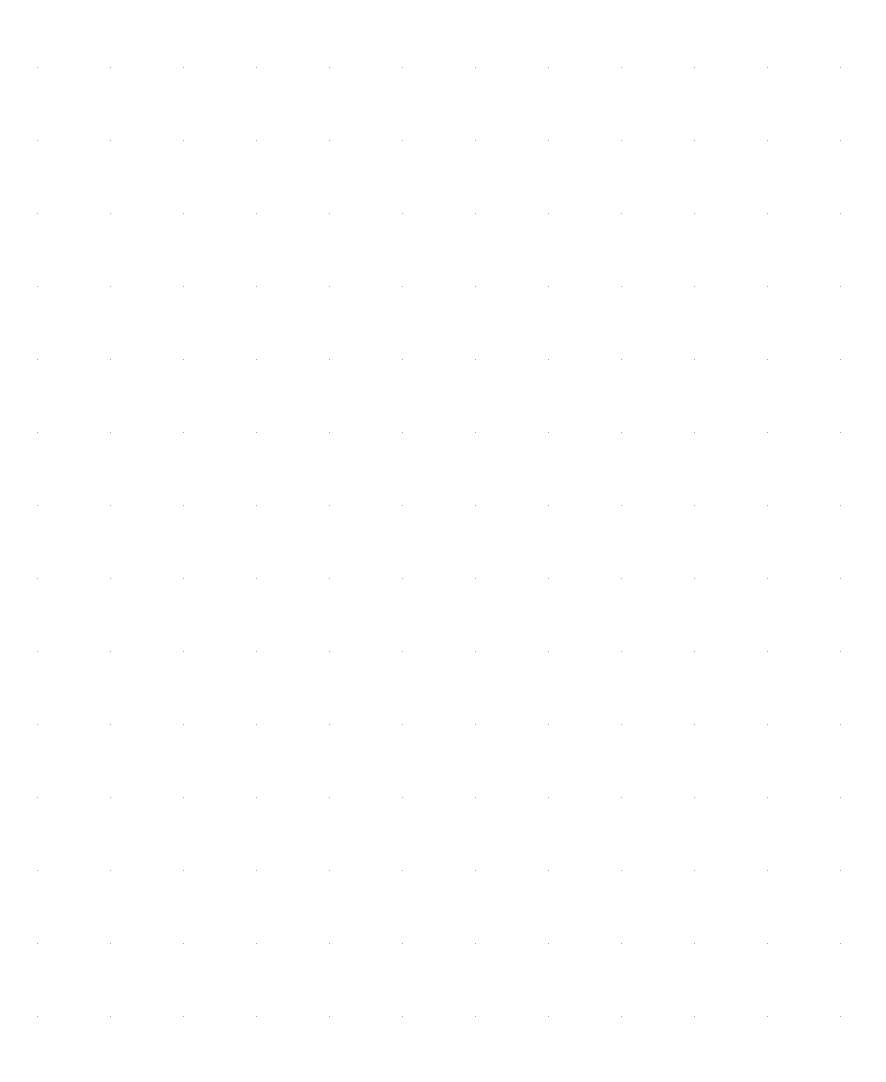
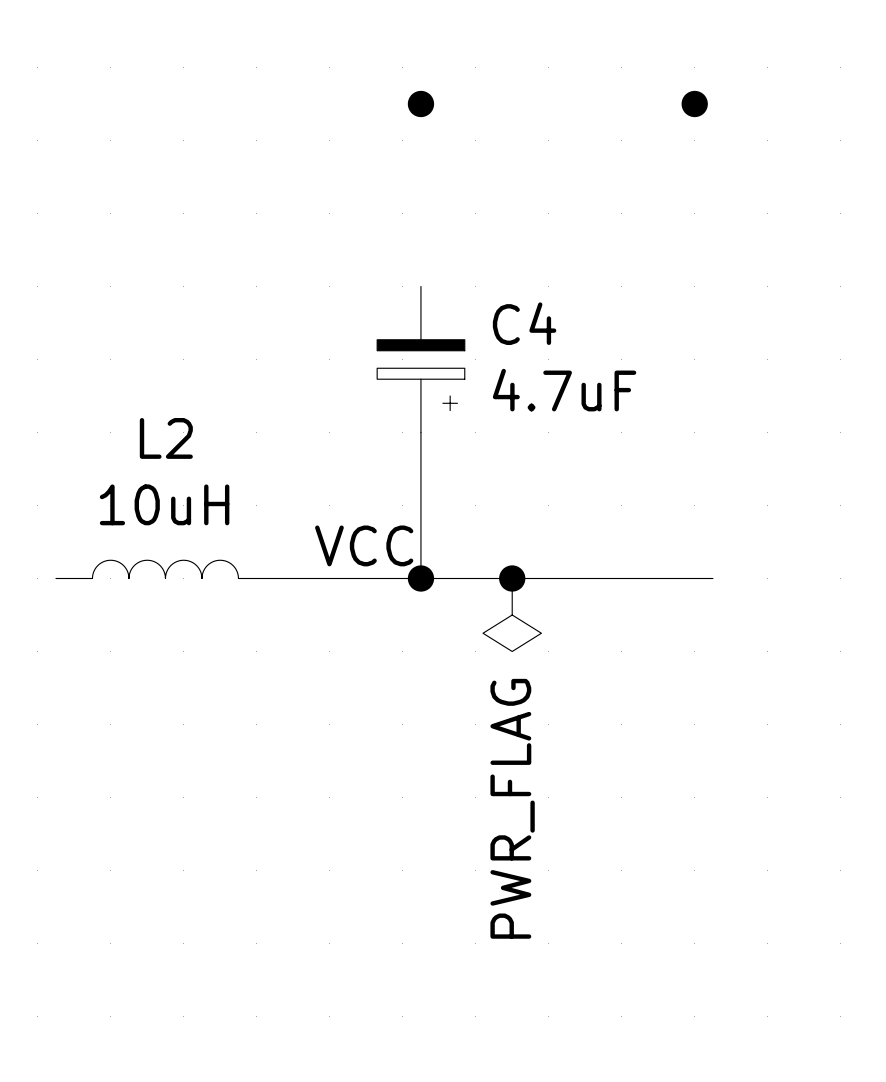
junction: none -> (420, 103)
junction: none -> (694, 103)
C4: none -> 4.7uF (420, 359)
wire: none -> (420, 432) (420, 578)
label: none -> VCC (364, 545)
L2: none -> 10uH (165, 569)
wire: none -> (274, 578) (712, 578)
junction: none -> (420, 578)
junction: none -> (512, 578)
power symbol: none -> PWR_FLAG (512, 615)

